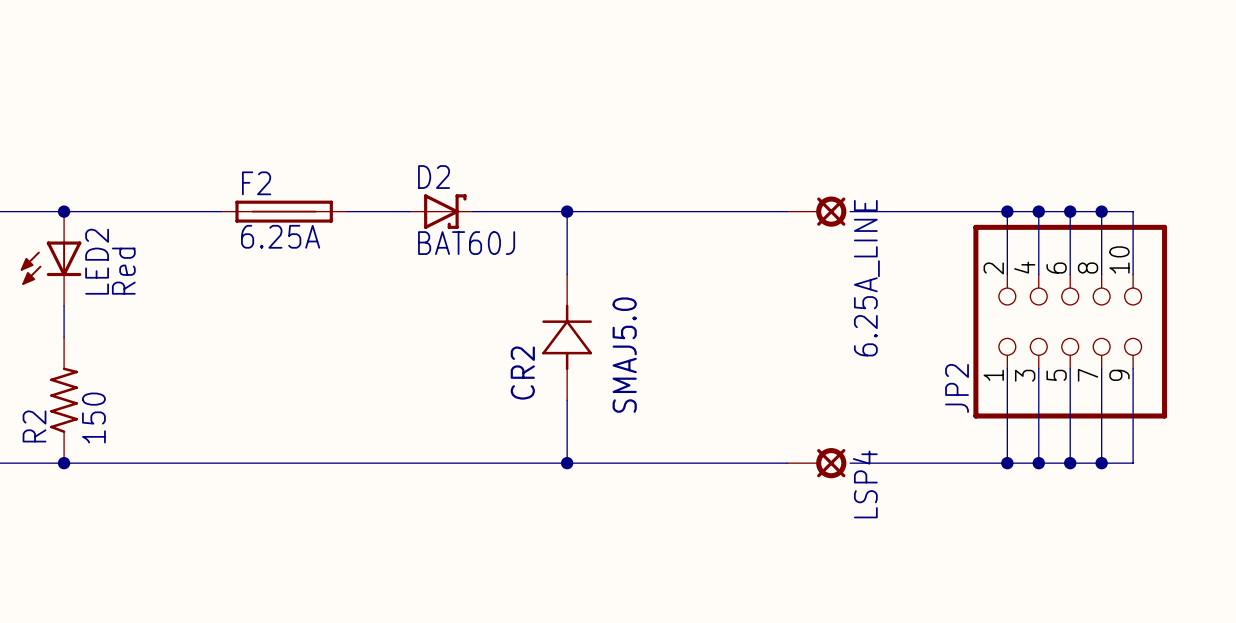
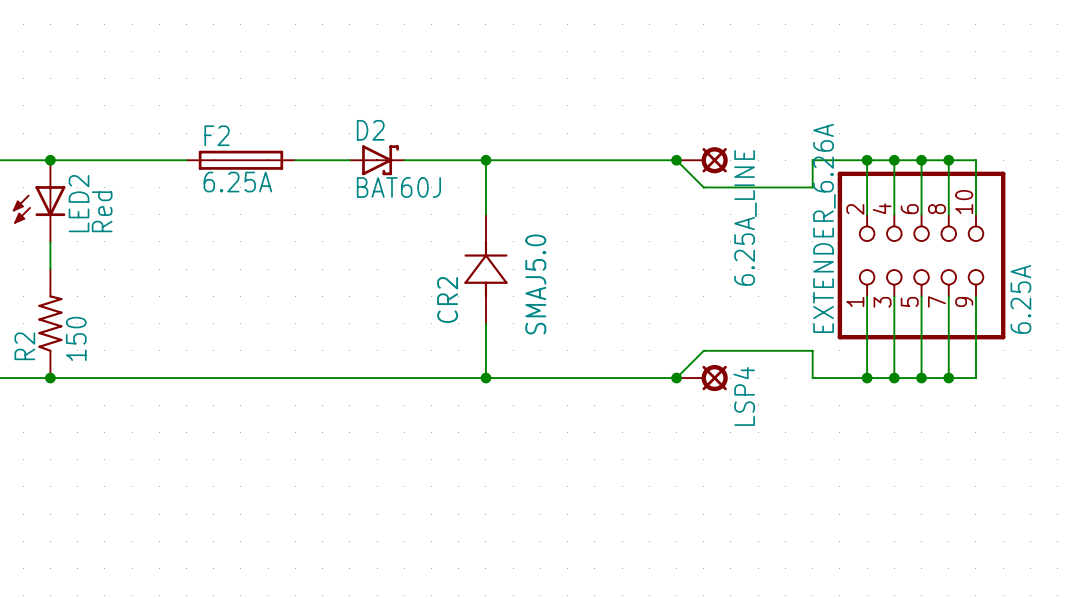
junction: none -> (676, 160)
wire: (850, 211) (944, 211) -> (676, 160) (703, 187) (812, 187) (812, 160)
JP2 value: none -> 6.25A (1020, 299)
JP2 name: JP2 (957, 388) -> EXTENDER_6.26A (824, 228)
junction: none -> (676, 378)
wire: (850, 463) (944, 463) -> (676, 378) (703, 350) (812, 350) (812, 378)

